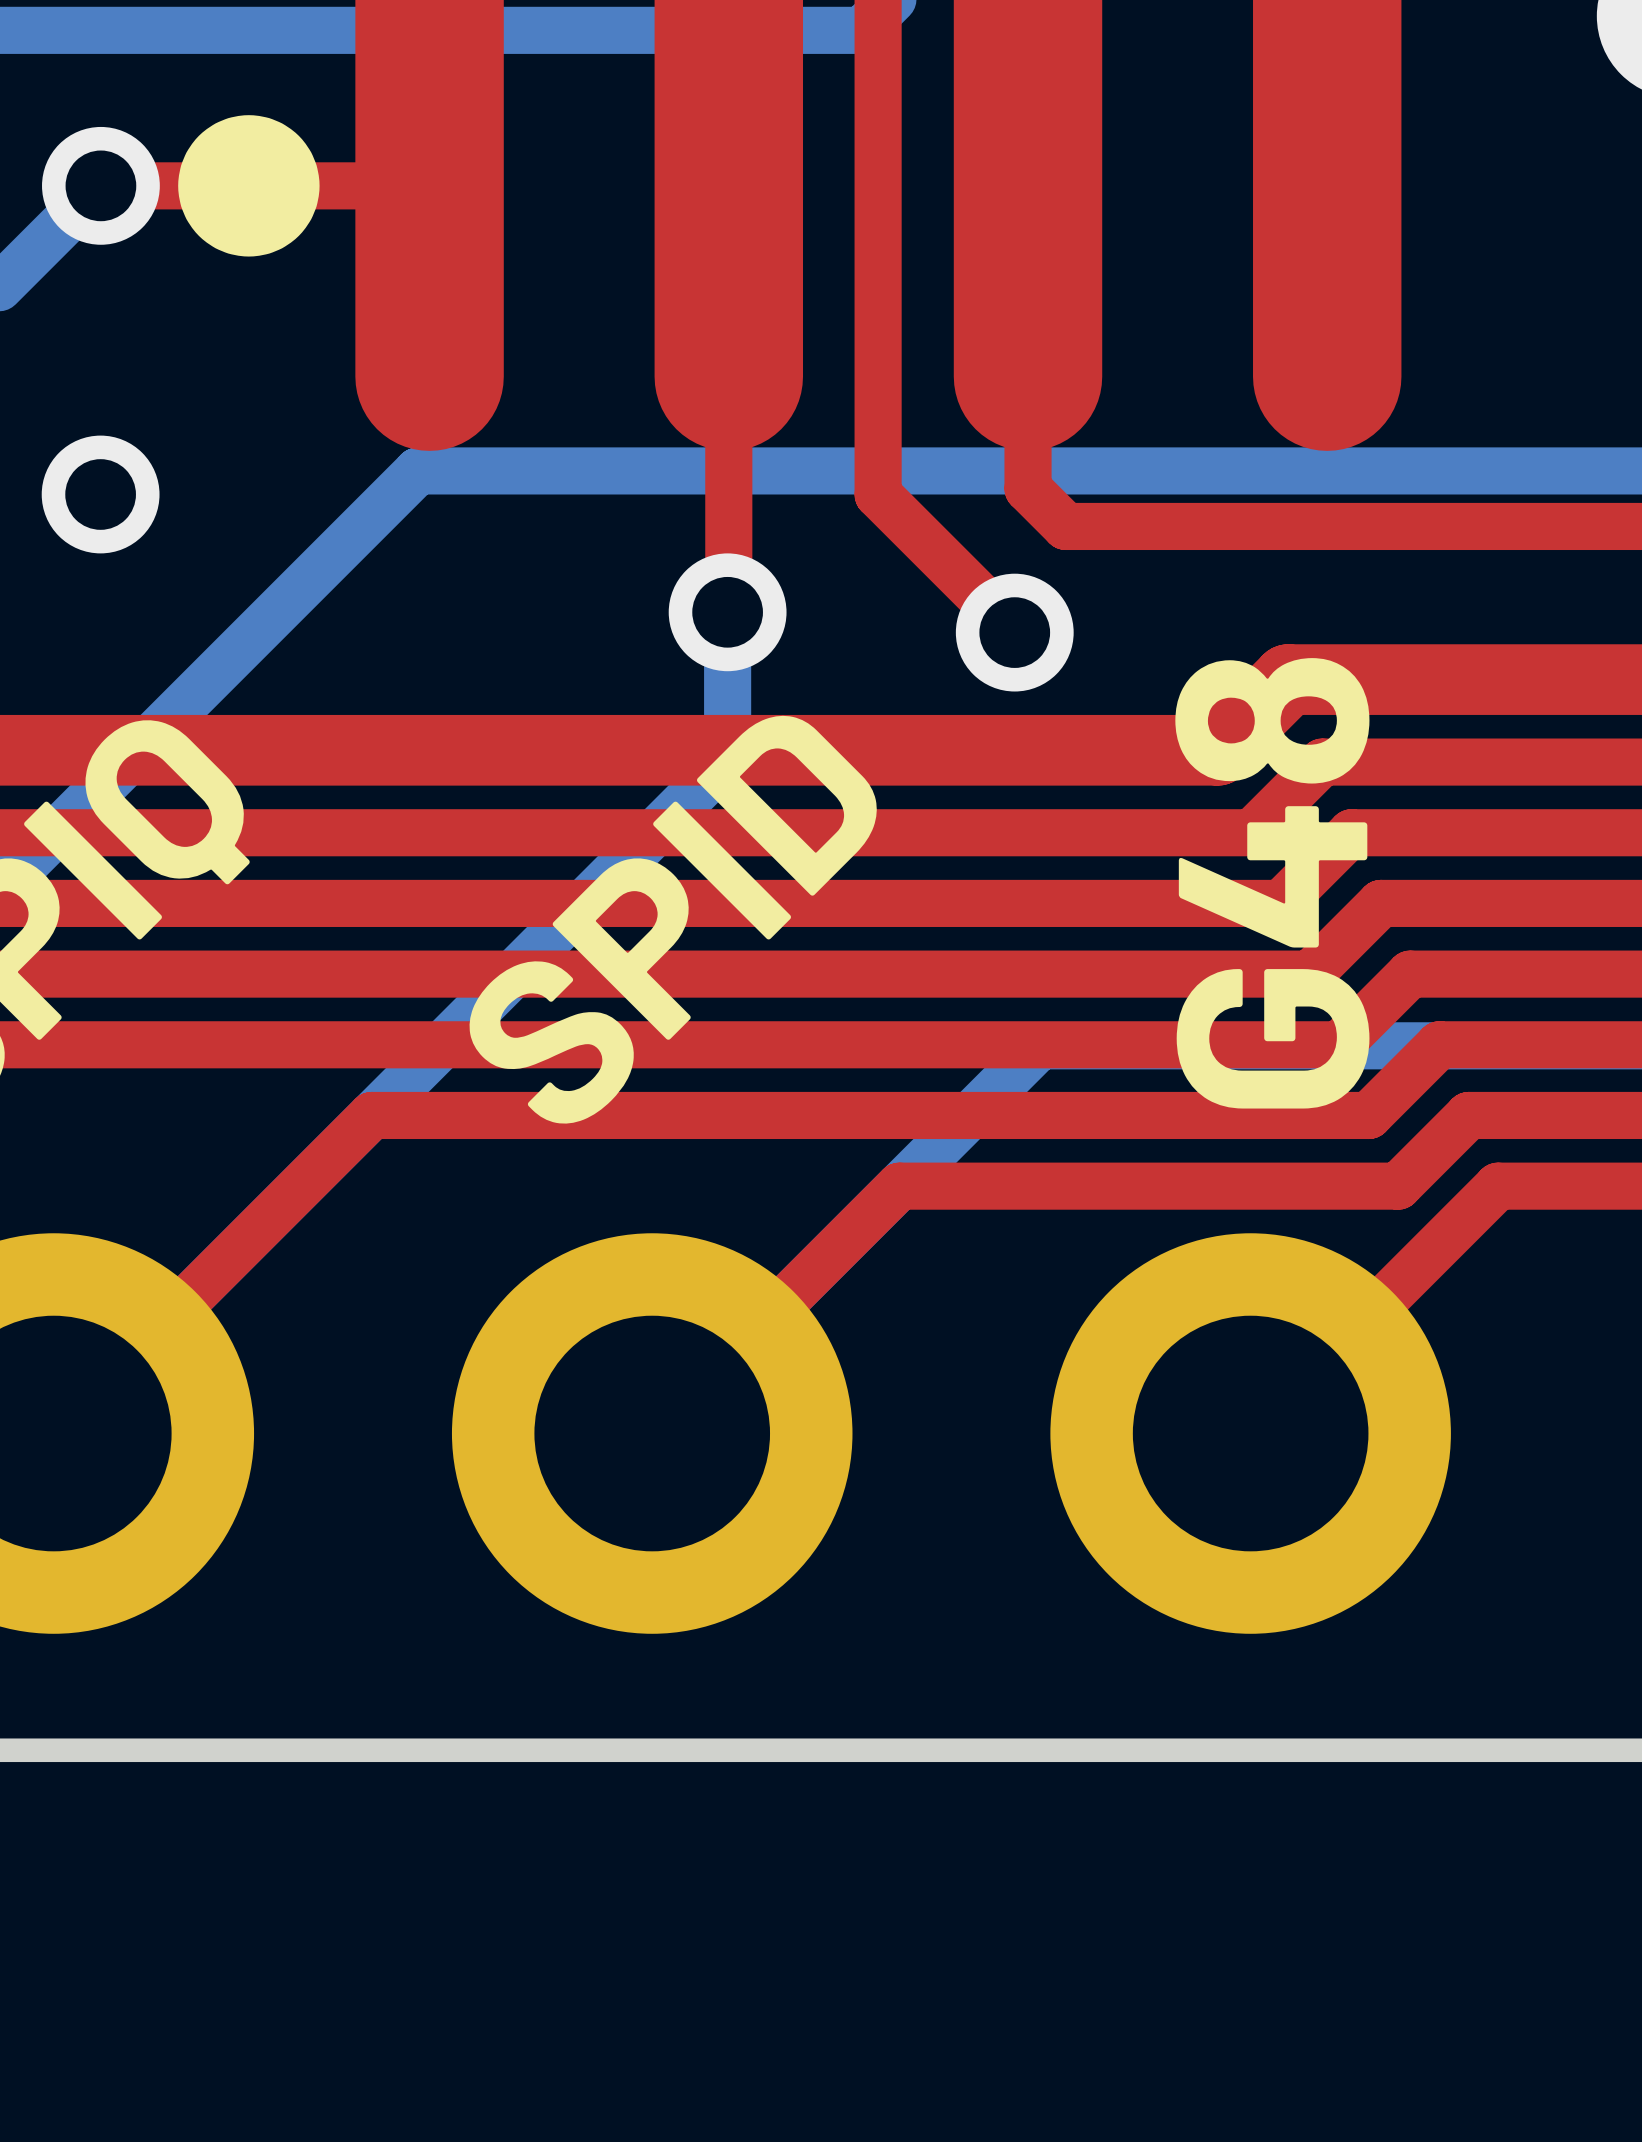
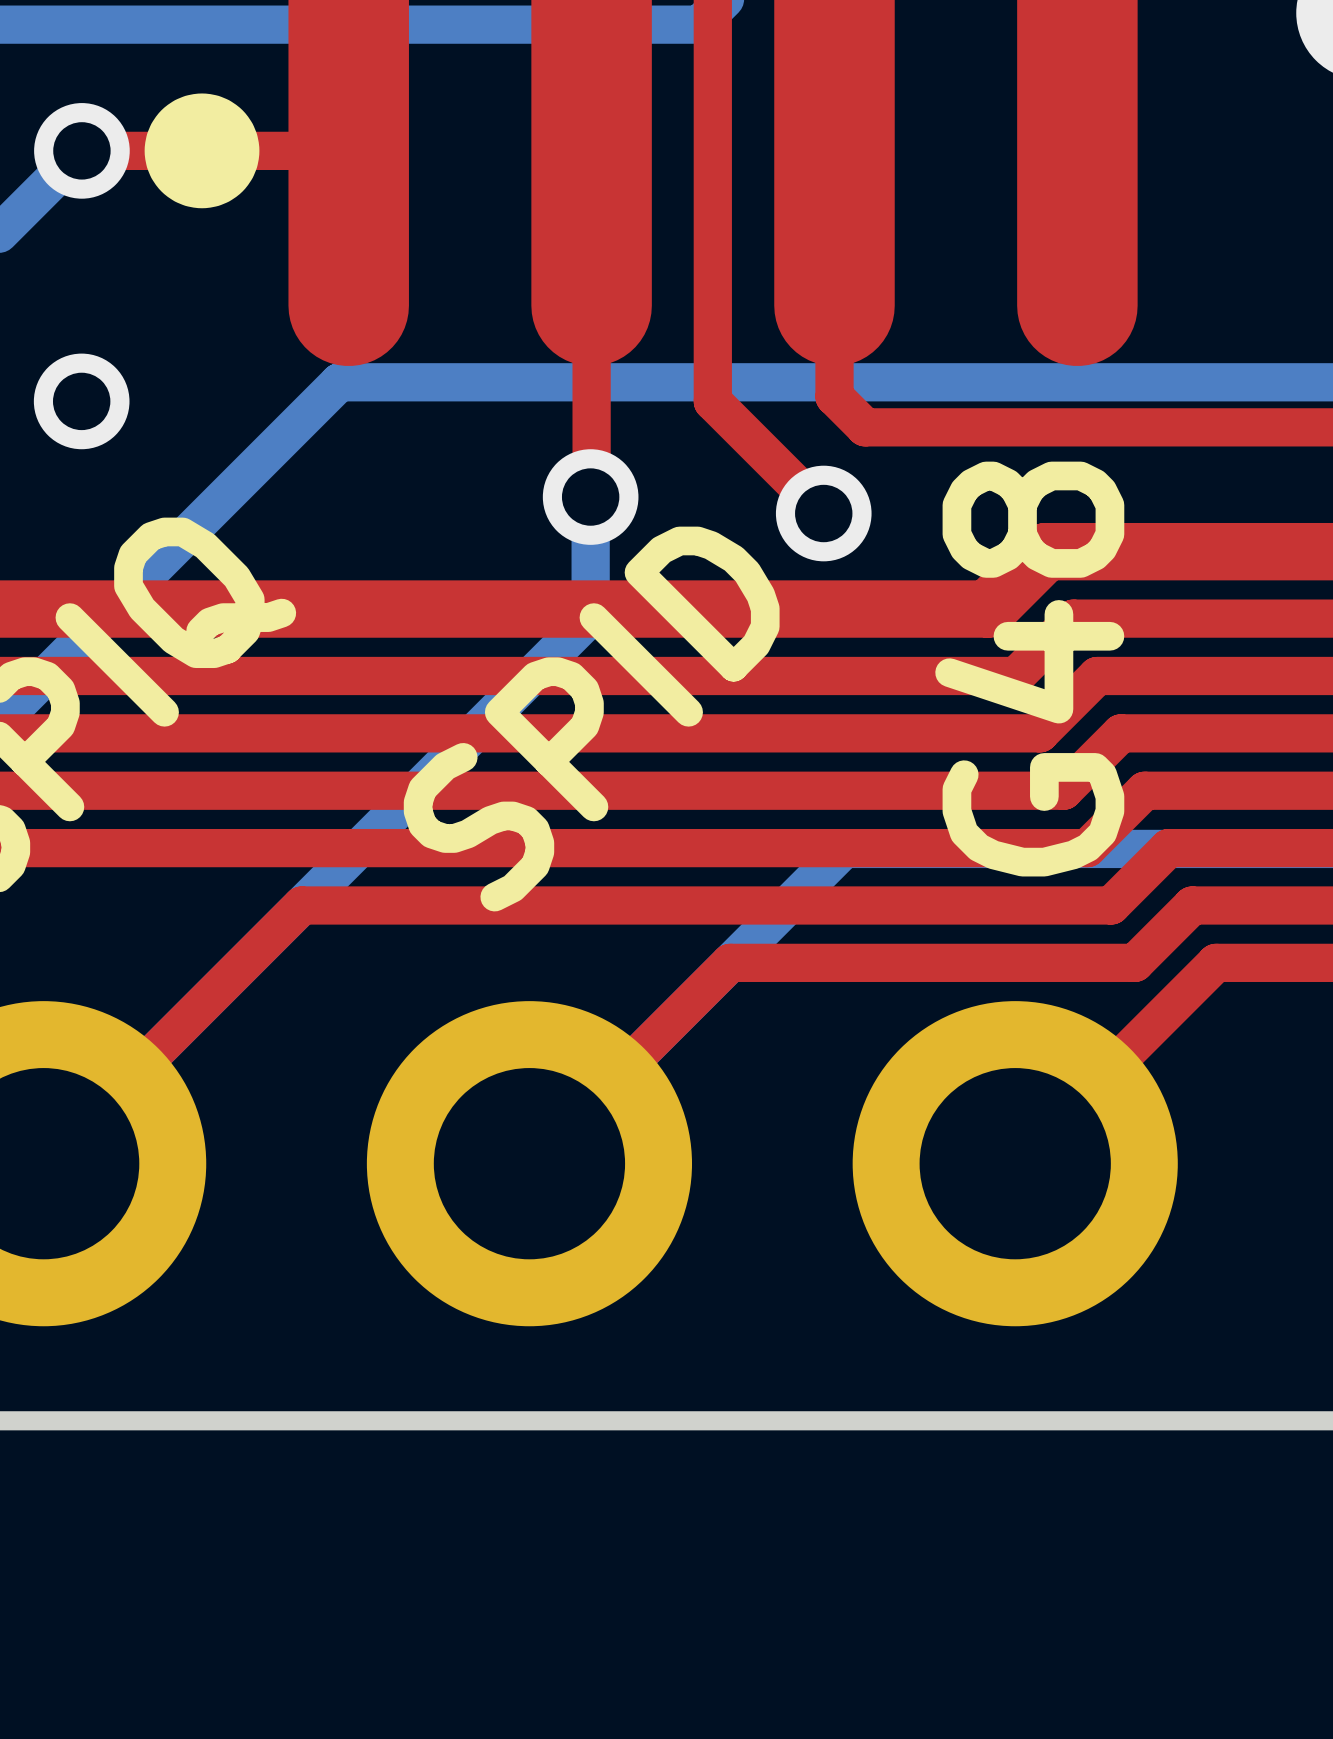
text position: SPID (673, 919) -> SPID (591, 719)

